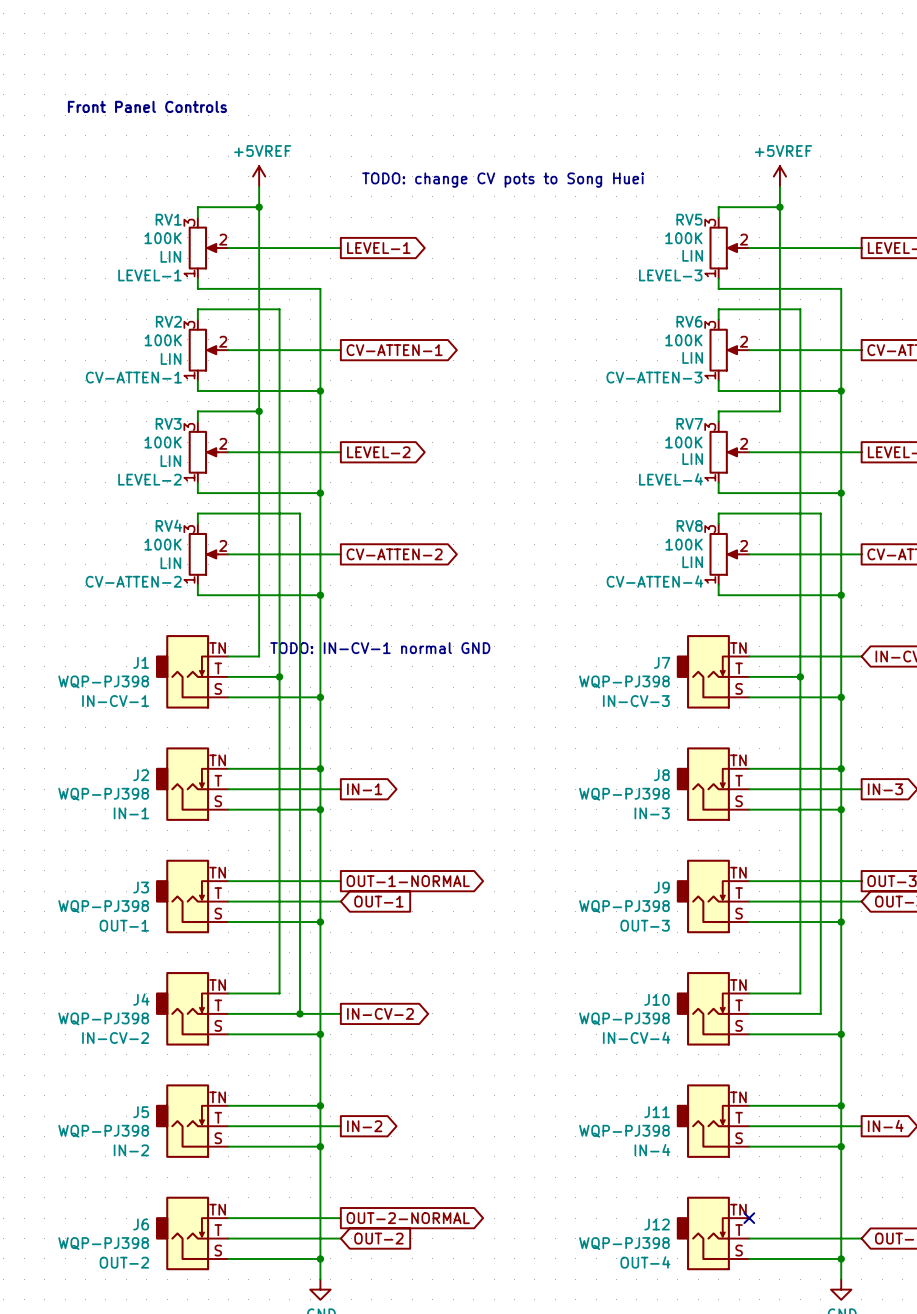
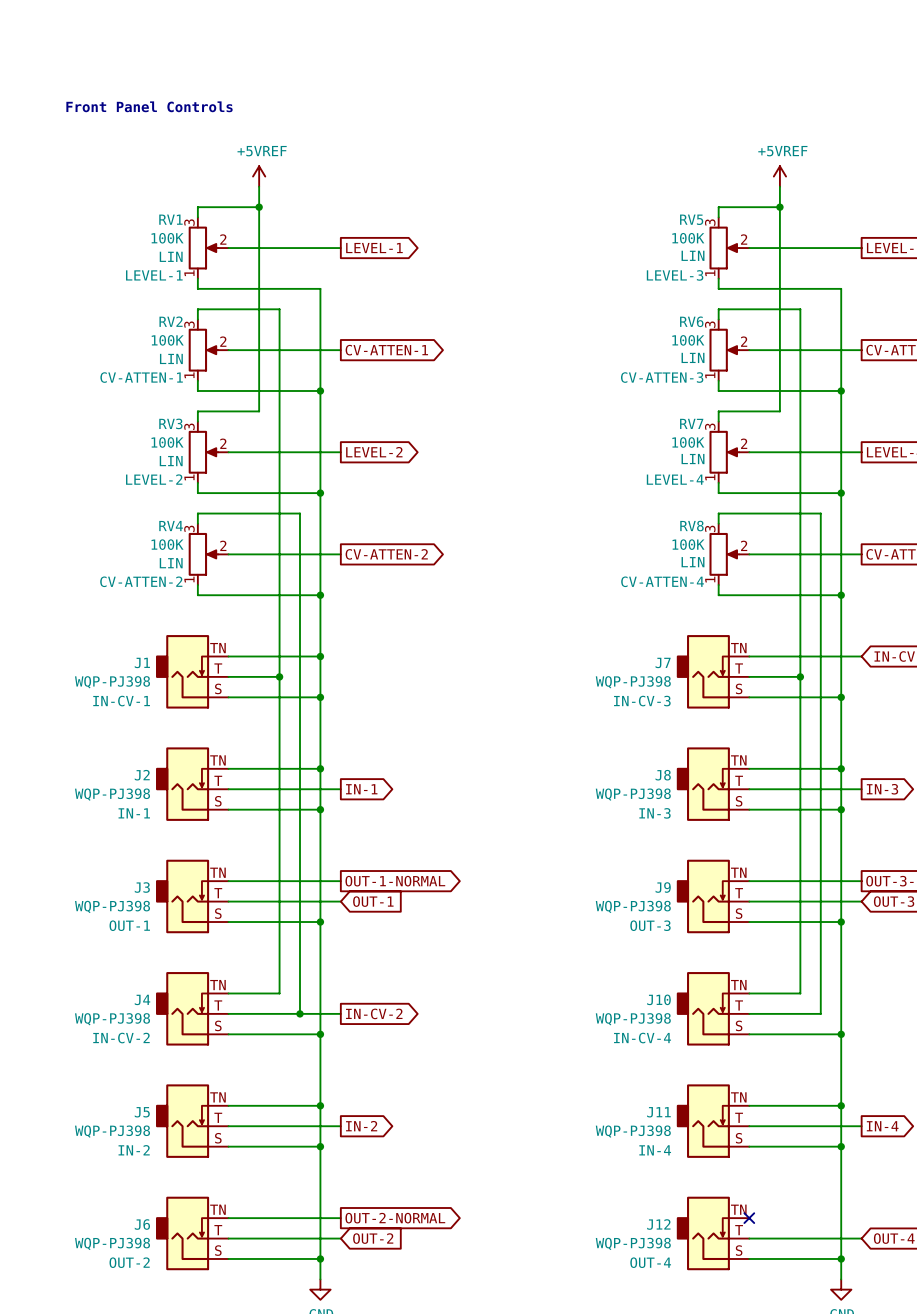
text: TODO: change CV pots to Song Huei (503, 180) -> none
wire: (259, 411) (259, 656) -> (320, 656) (259, 656)
junction: (259, 411) -> none
text: TODO: IN-CV-1 normal GND (380, 648) -> none
junction: none -> (320, 656)

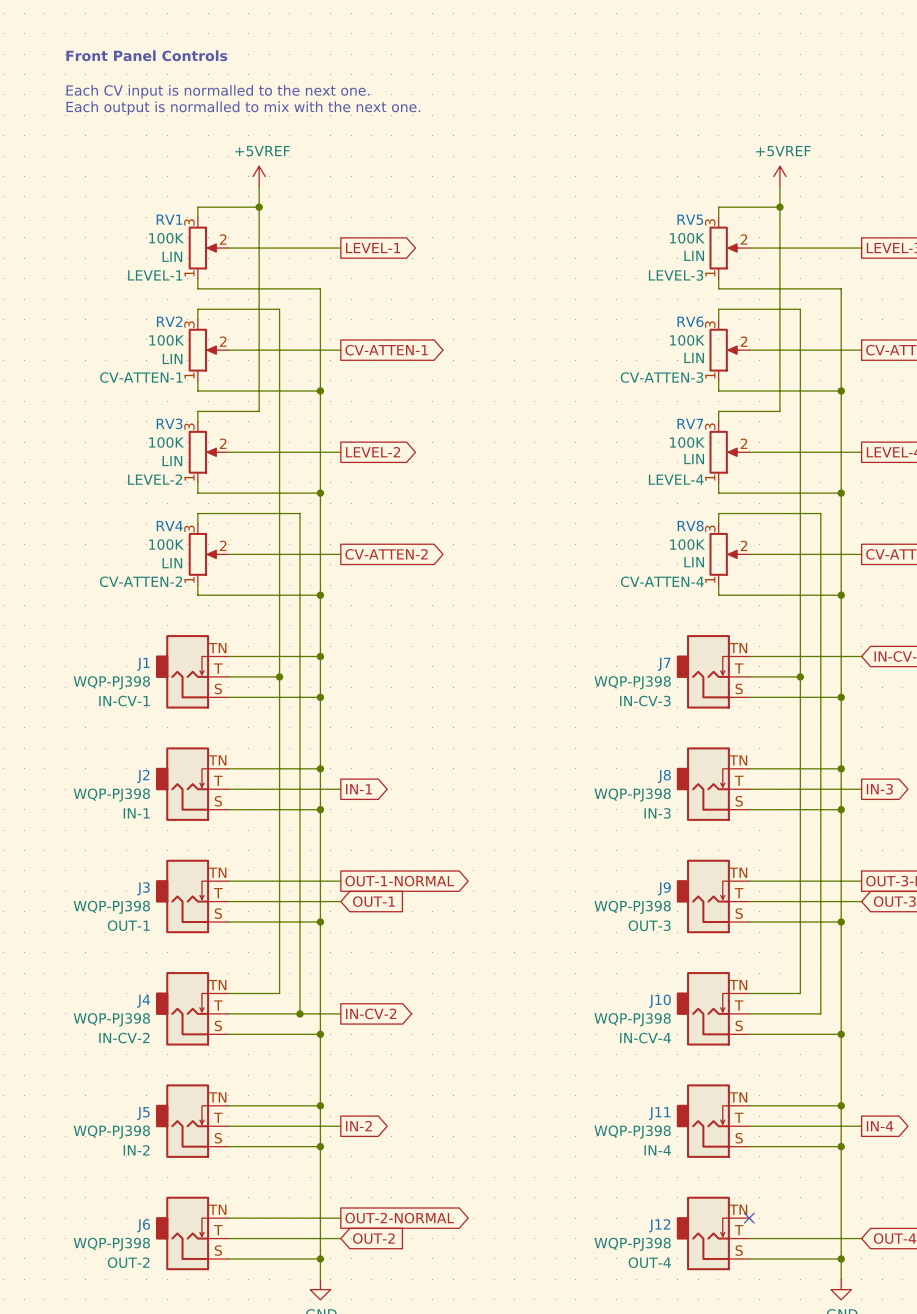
text: none -> Front Panel Controls (146, 55)
text: none -> Each CV input is normalled to the next one. (217, 91)
text: Front Panel Controls (149, 106) -> Each output is normalled to mix with the next one. (243, 108)

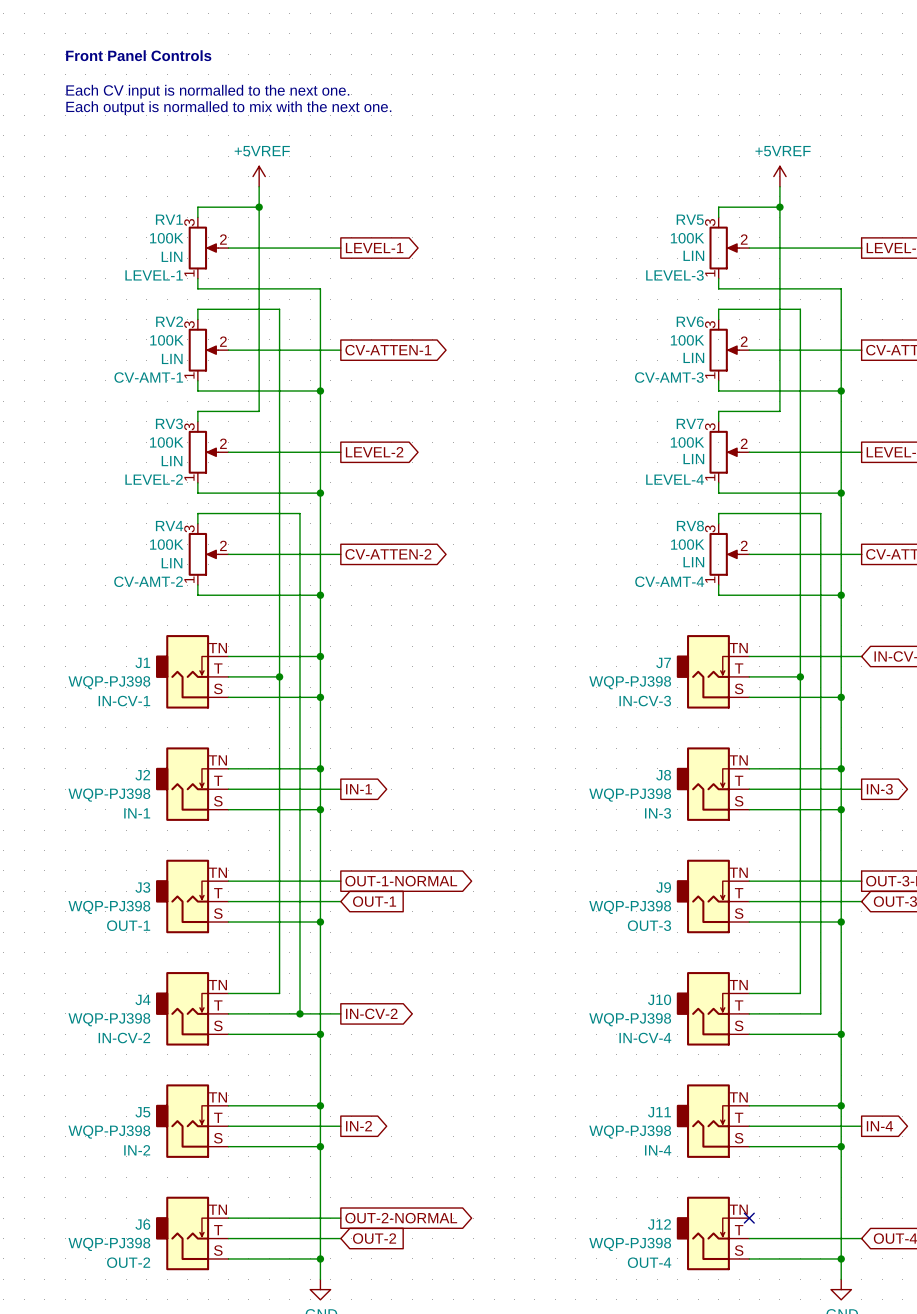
RV2 text: CV-ATTEN-1 (141, 377) -> CV-AMT-1 (148, 377)
RV6 text: CV-ATTEN-3 (662, 377) -> CV-AMT-3 (669, 377)
RV4 text: CV-ATTEN-2 (141, 581) -> CV-AMT-2 (148, 581)
RV8 text: CV-ATTEN-4 (662, 581) -> CV-AMT-4 (669, 581)

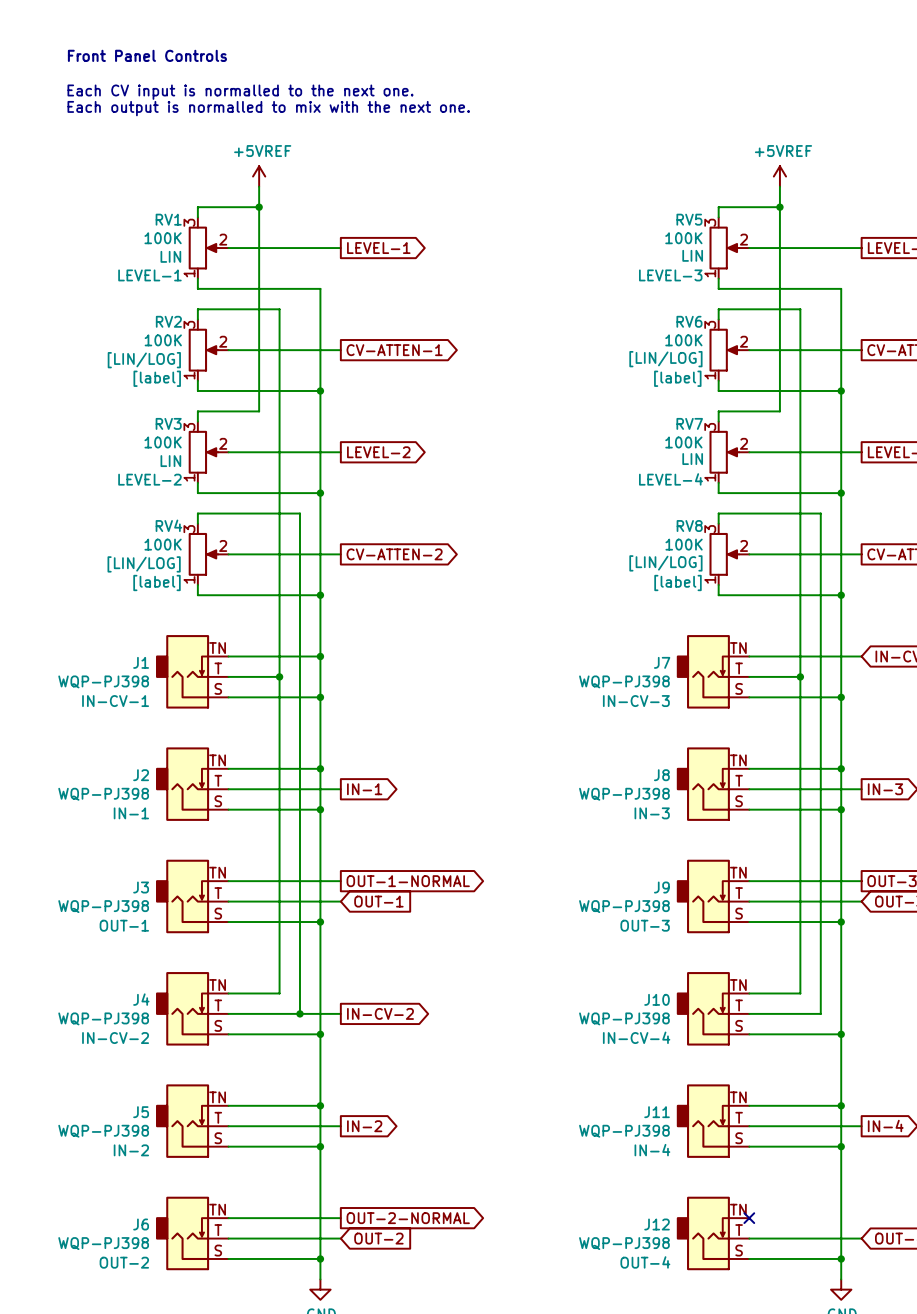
RV6 text: LIN (693, 357) -> [LIN/LOG] (665, 359)
RV2 text: LIN (172, 358) -> [LIN/LOG] (144, 360)
RV2 text: CV-AMT-1 (148, 377) -> [label] (157, 378)
RV6 text: CV-AMT-3 (669, 377) -> [label] (677, 378)
RV8 text: LIN (693, 562) -> [LIN/LOG] (665, 563)
RV4 text: LIN (172, 563) -> [LIN/LOG] (144, 564)
RV4 text: CV-AMT-2 (148, 581) -> [label] (157, 582)
RV8 text: CV-AMT-4 (669, 581) -> [label] (678, 582)

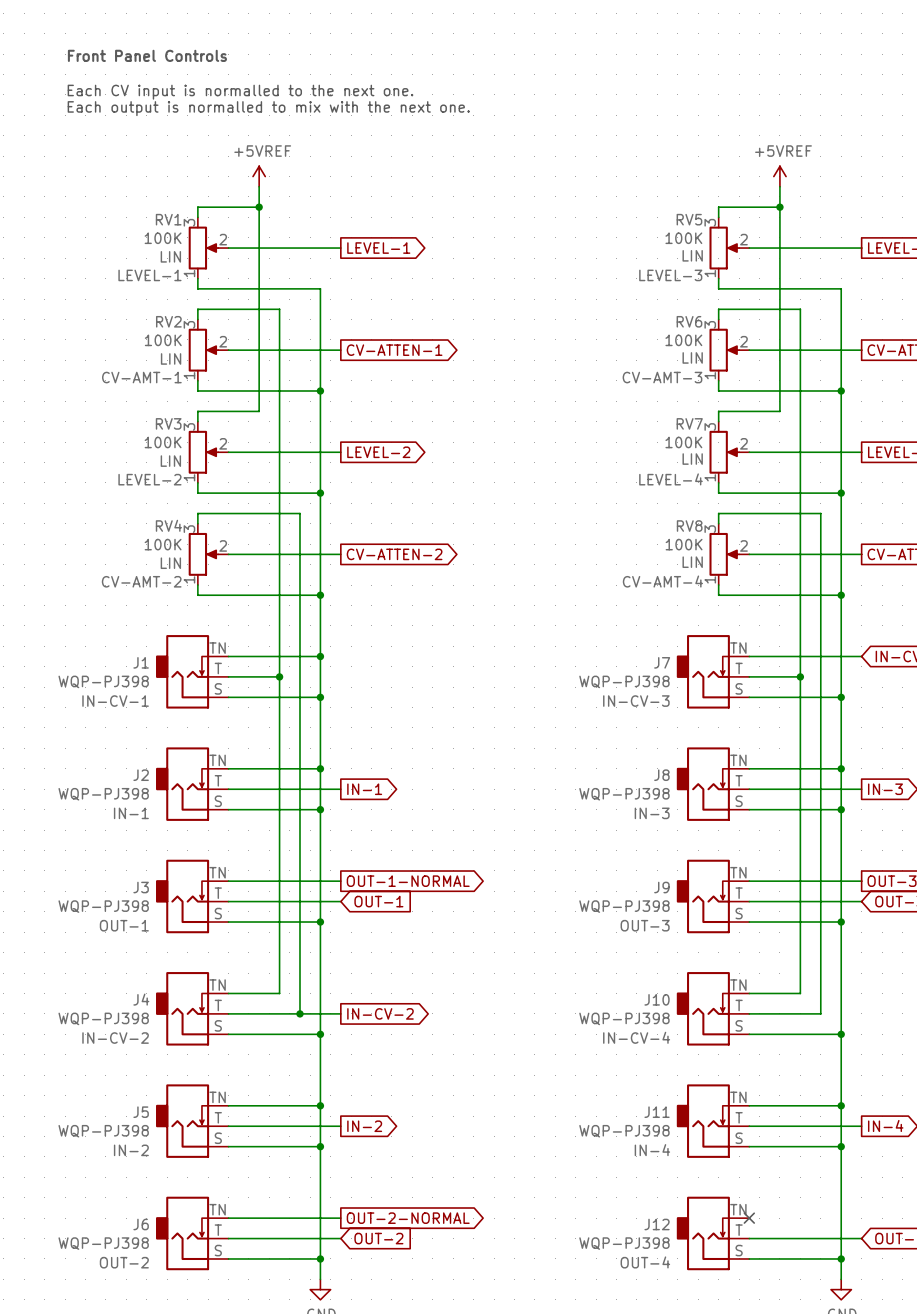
RV6 text: [LIN/LOG] (665, 359) -> LIN (692, 357)
RV2 text: [LIN/LOG] (144, 360) -> LIN (171, 358)
RV2 text: [label] (157, 378) -> CV-AMT-1 (141, 377)
RV6 text: [label] (677, 378) -> CV-AMT-3 (662, 377)
RV8 text: [LIN/LOG] (665, 563) -> LIN (692, 562)
RV4 text: [LIN/LOG] (144, 564) -> LIN (170, 563)
RV4 text: [label] (157, 582) -> CV-AMT-2 (141, 581)
RV8 text: [label] (678, 582) -> CV-AMT-4 (662, 581)

